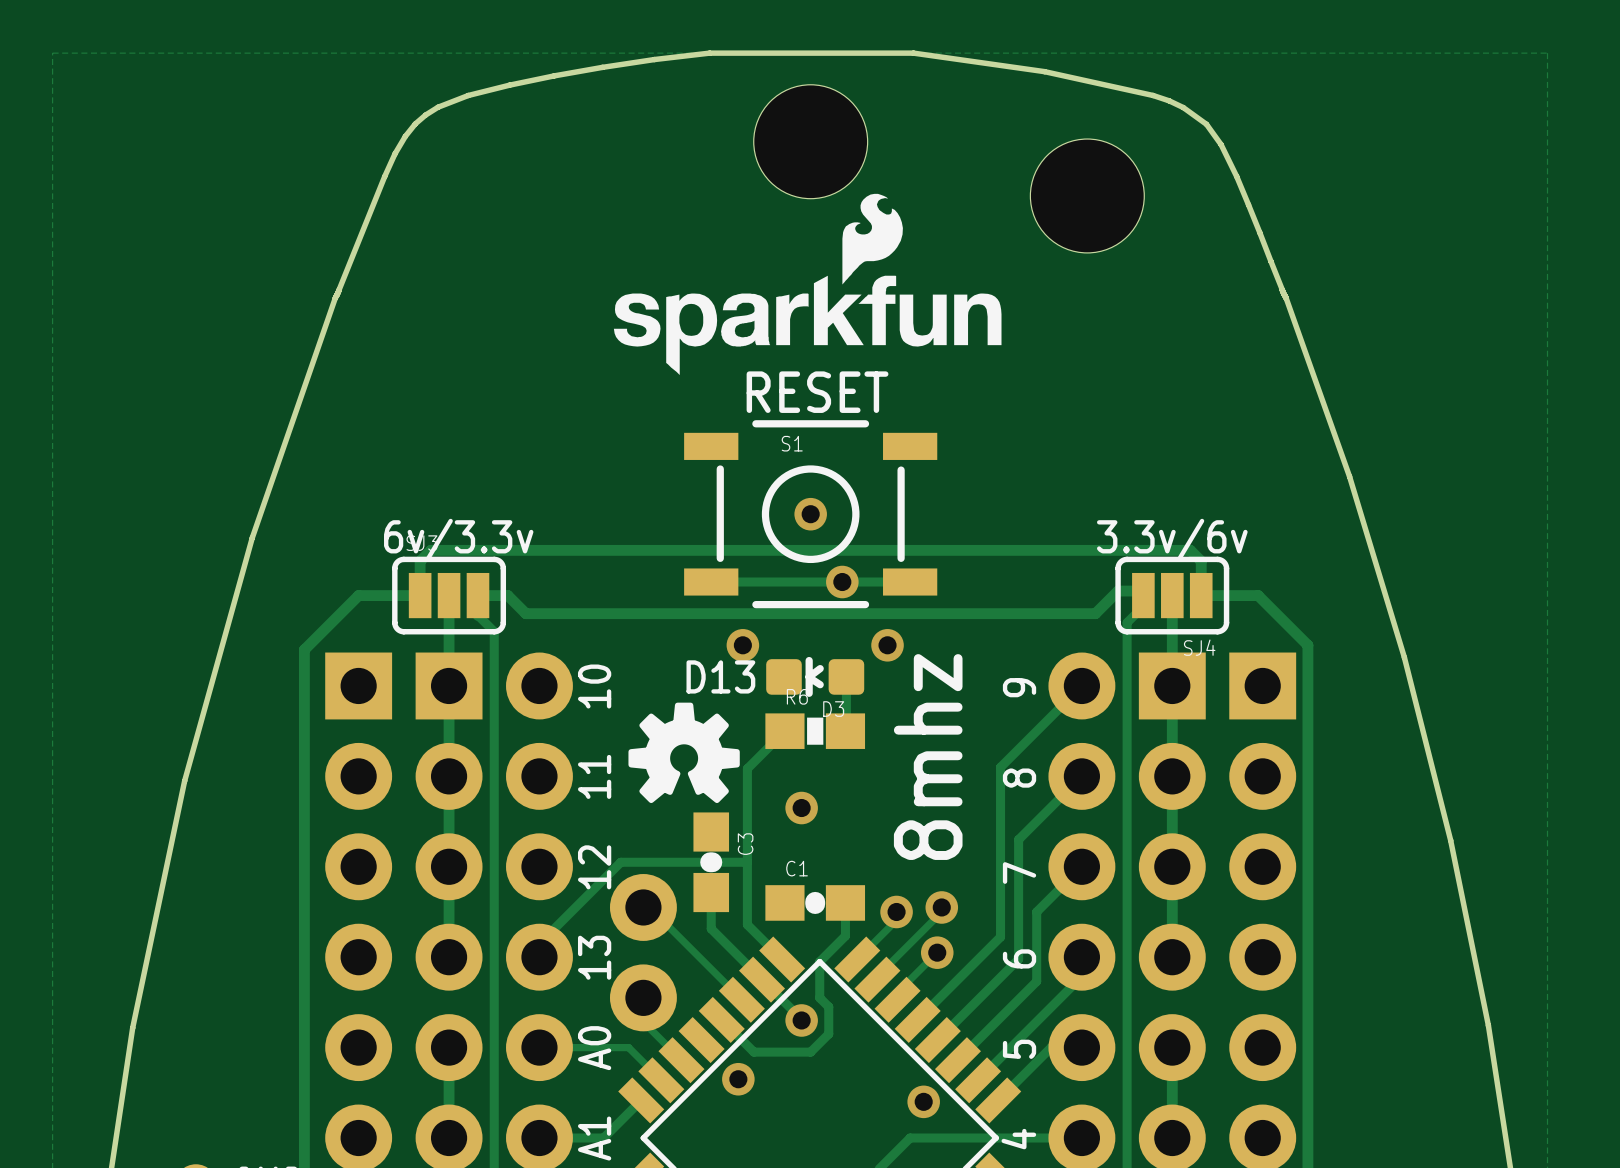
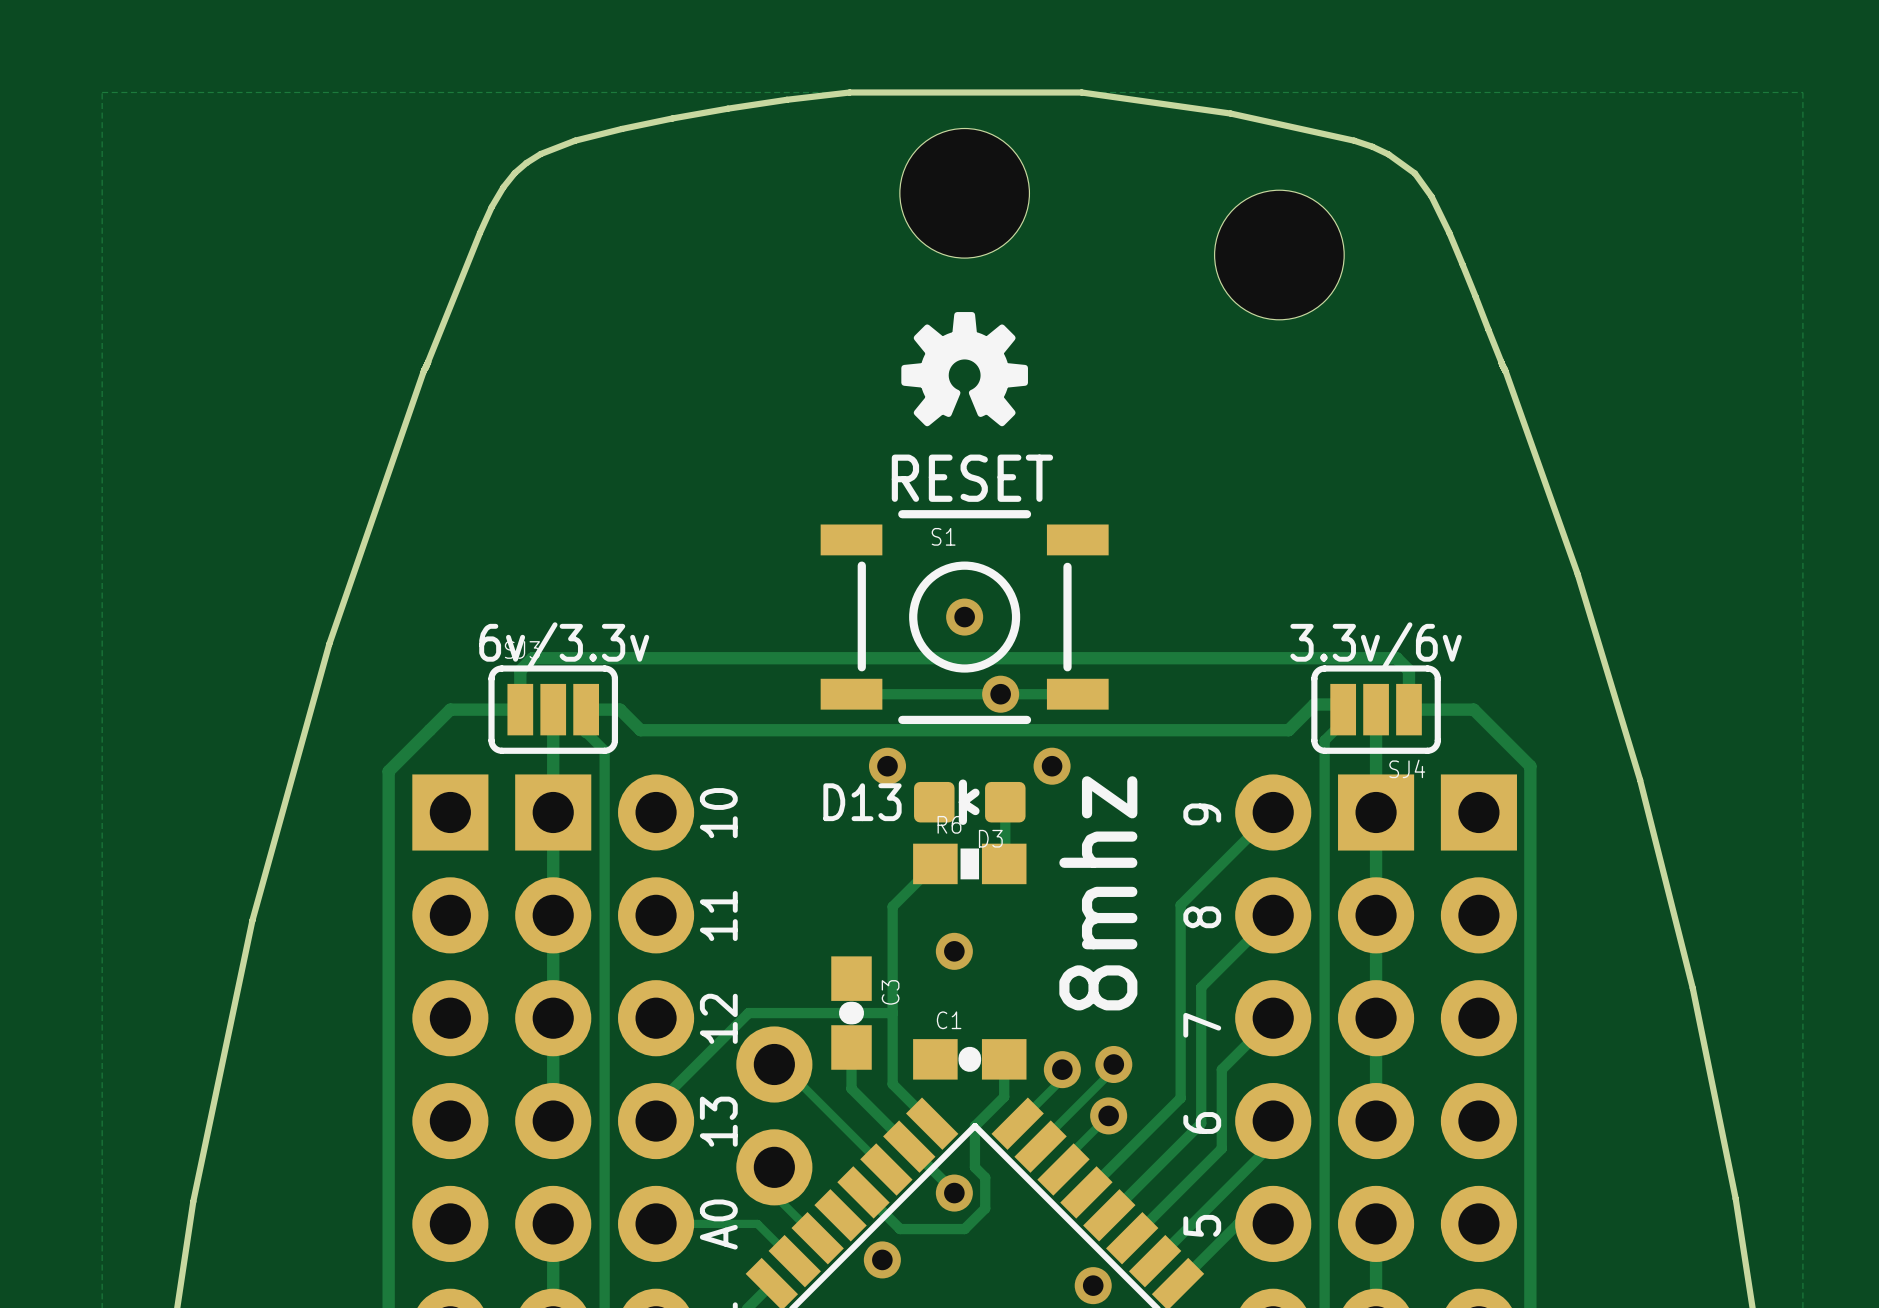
drawing: [613, 193, 1002, 376] -> none
drawing position: (684, 752) -> (964, 369)

